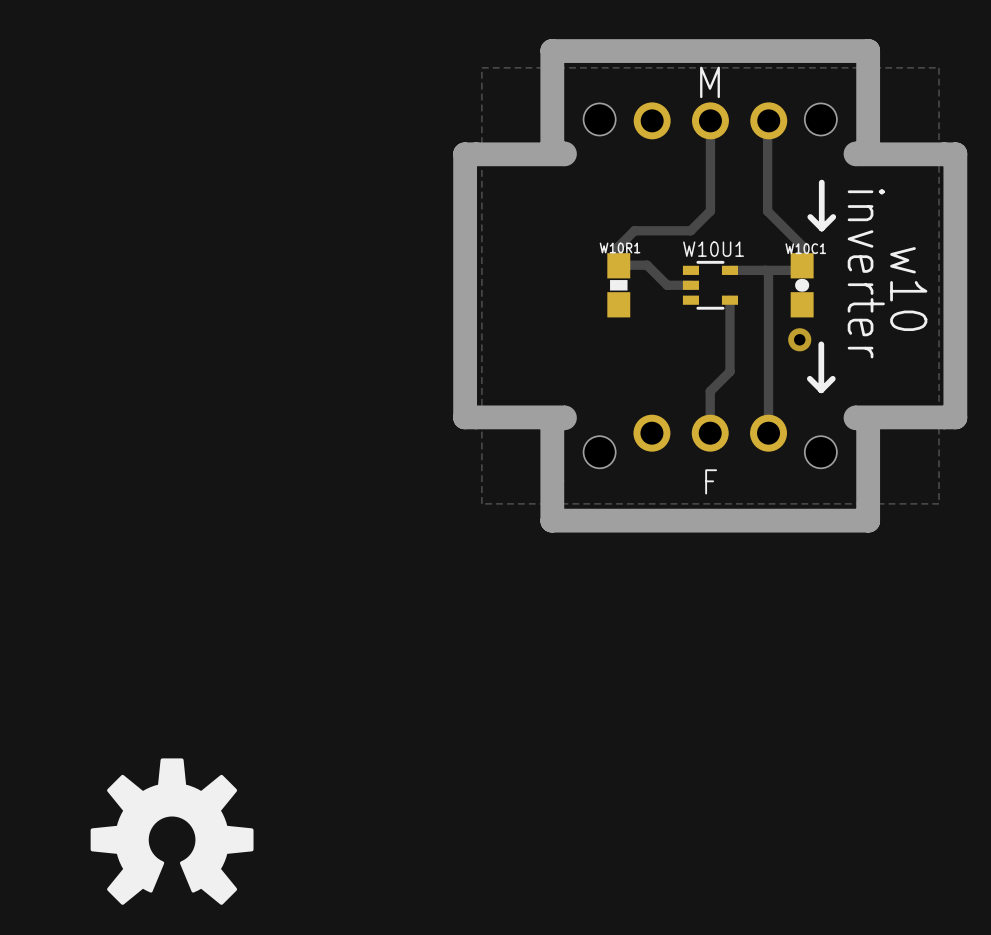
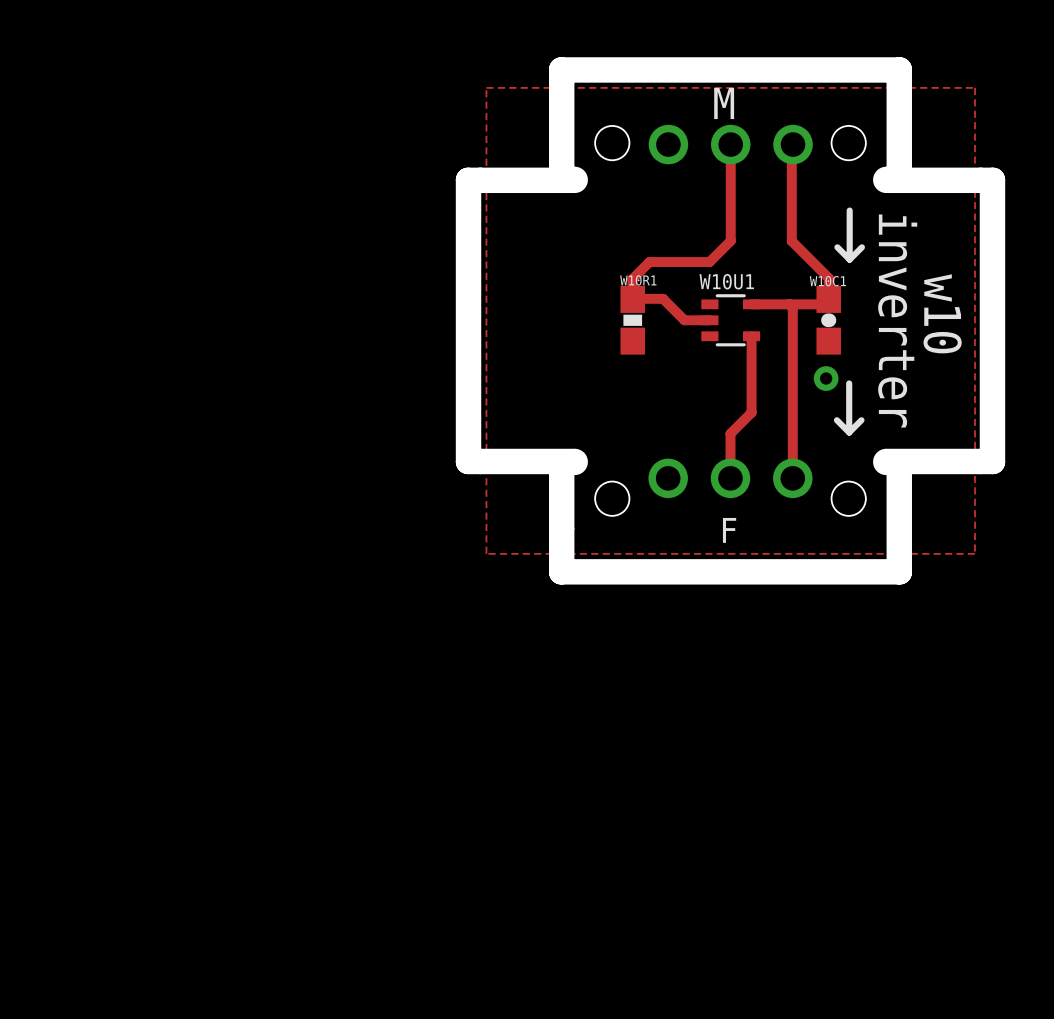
drawing: [90, 758, 254, 905] -> none

